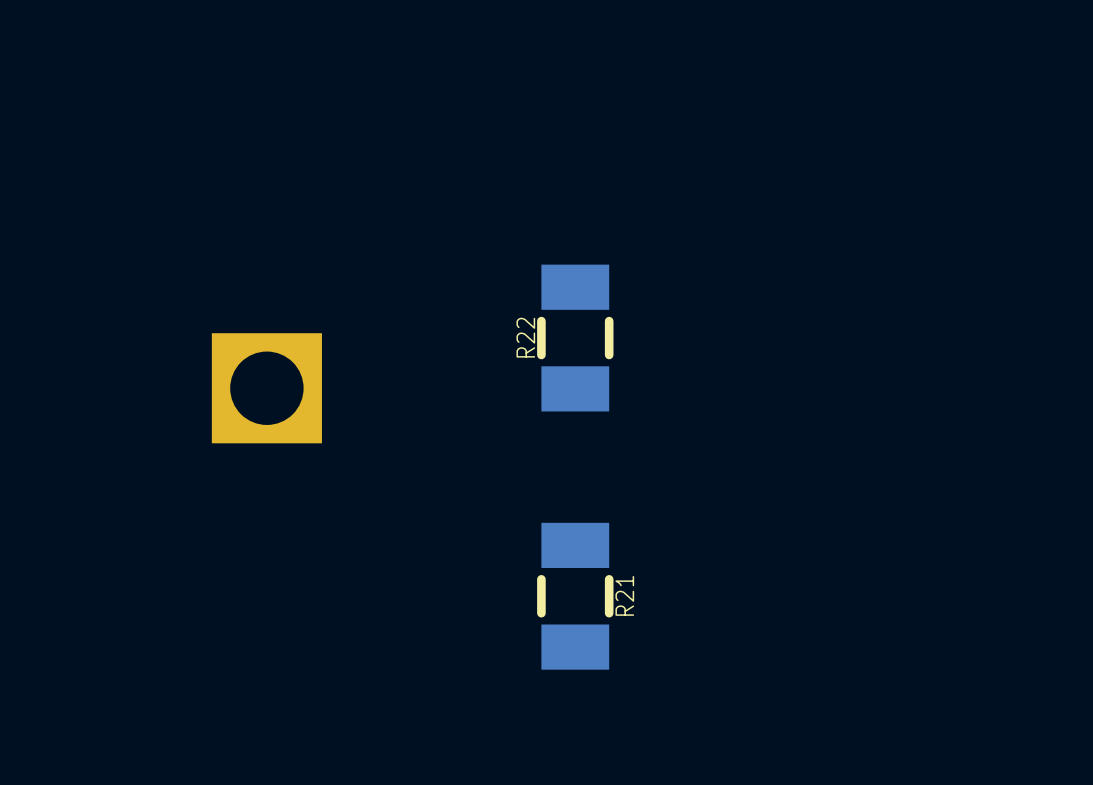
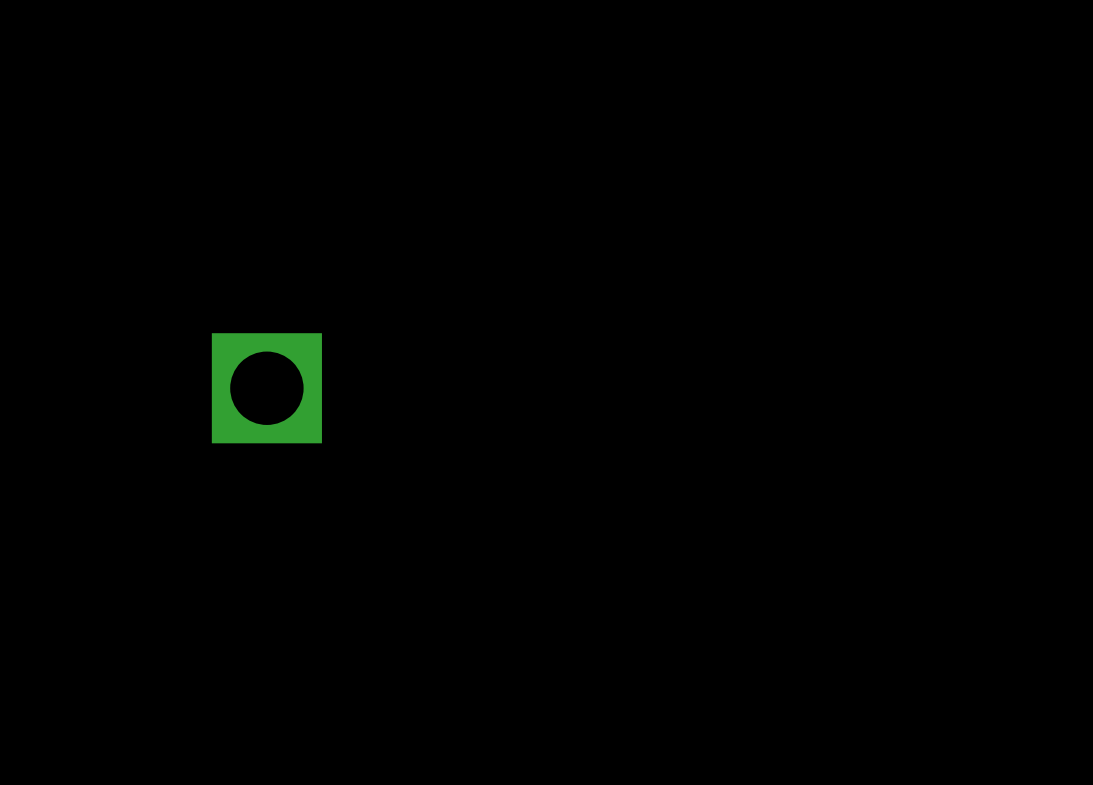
R22: (575, 338) -> none
R21: (575, 596) -> none

